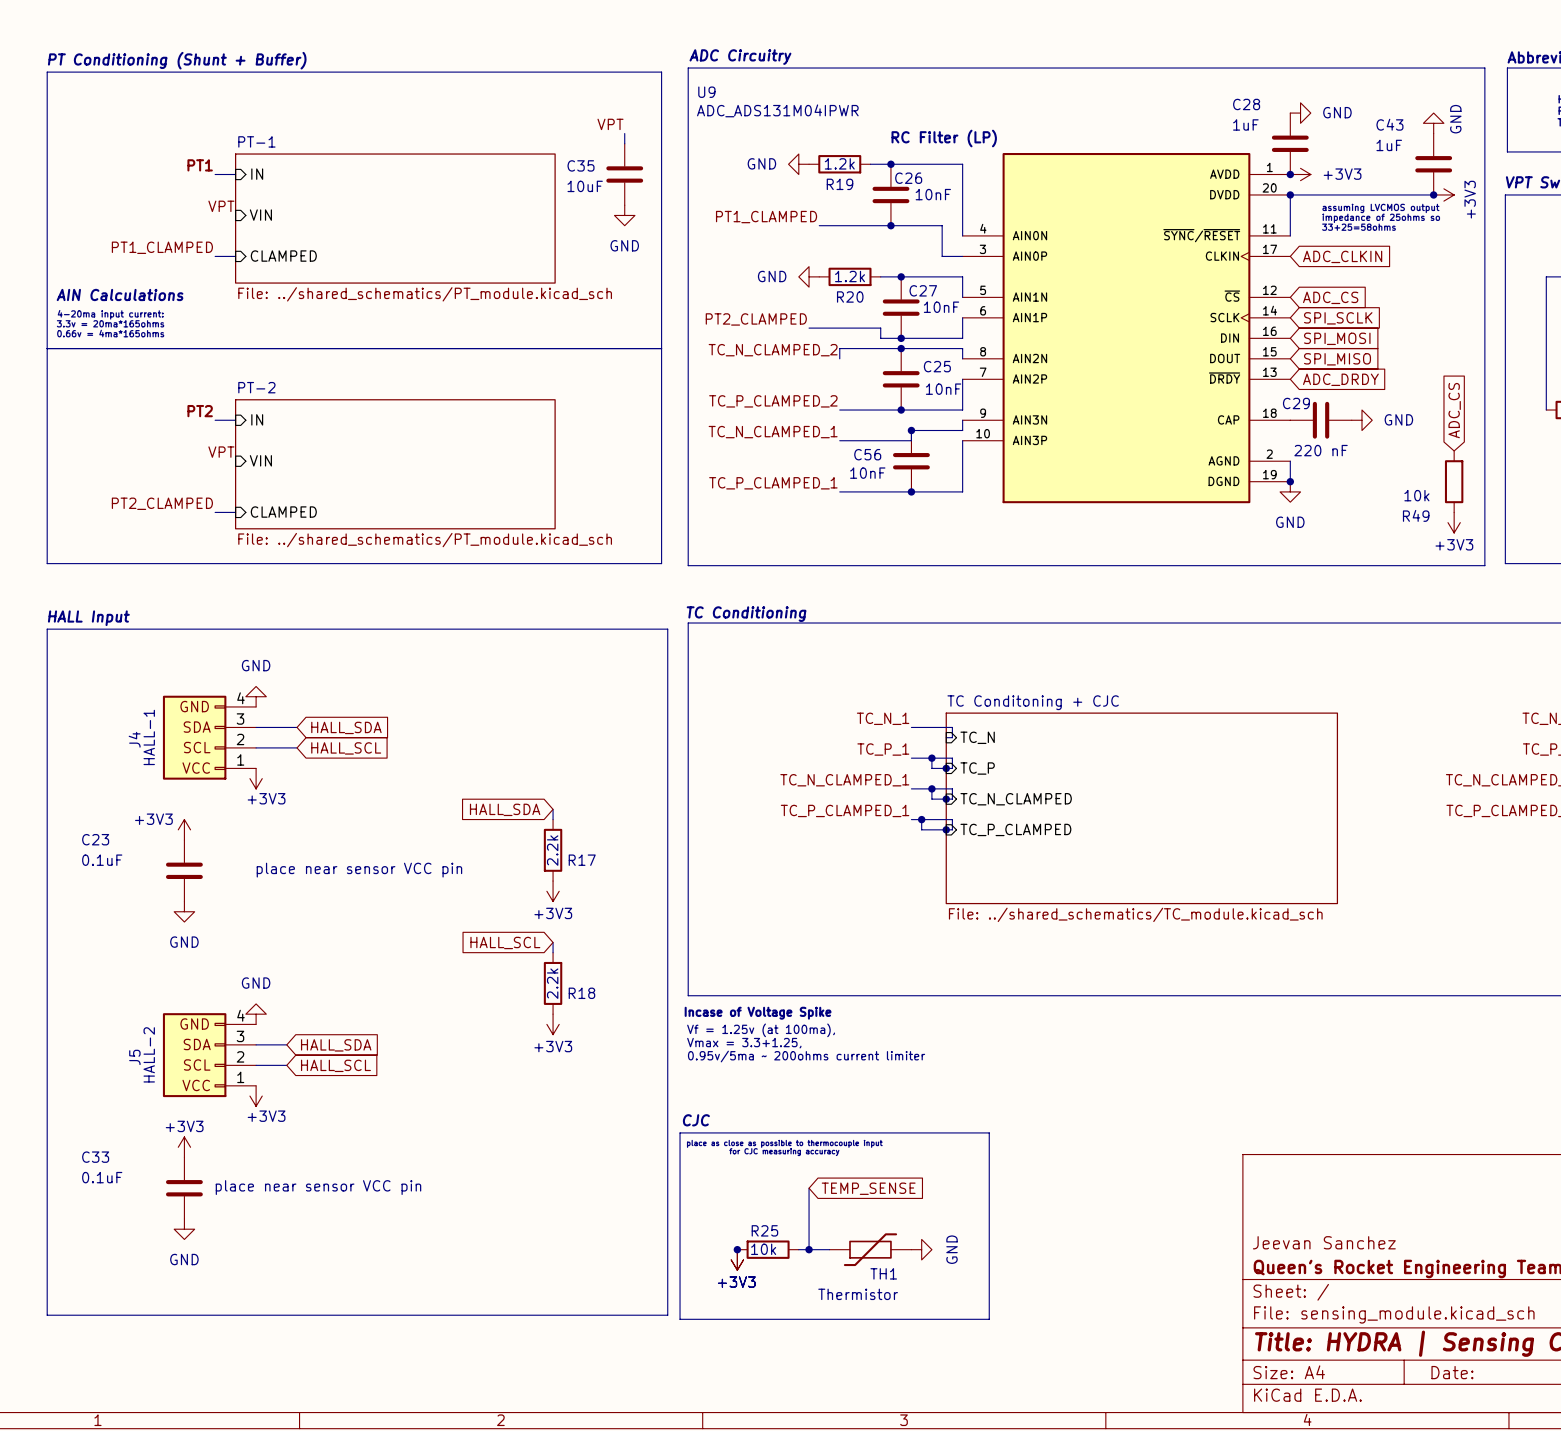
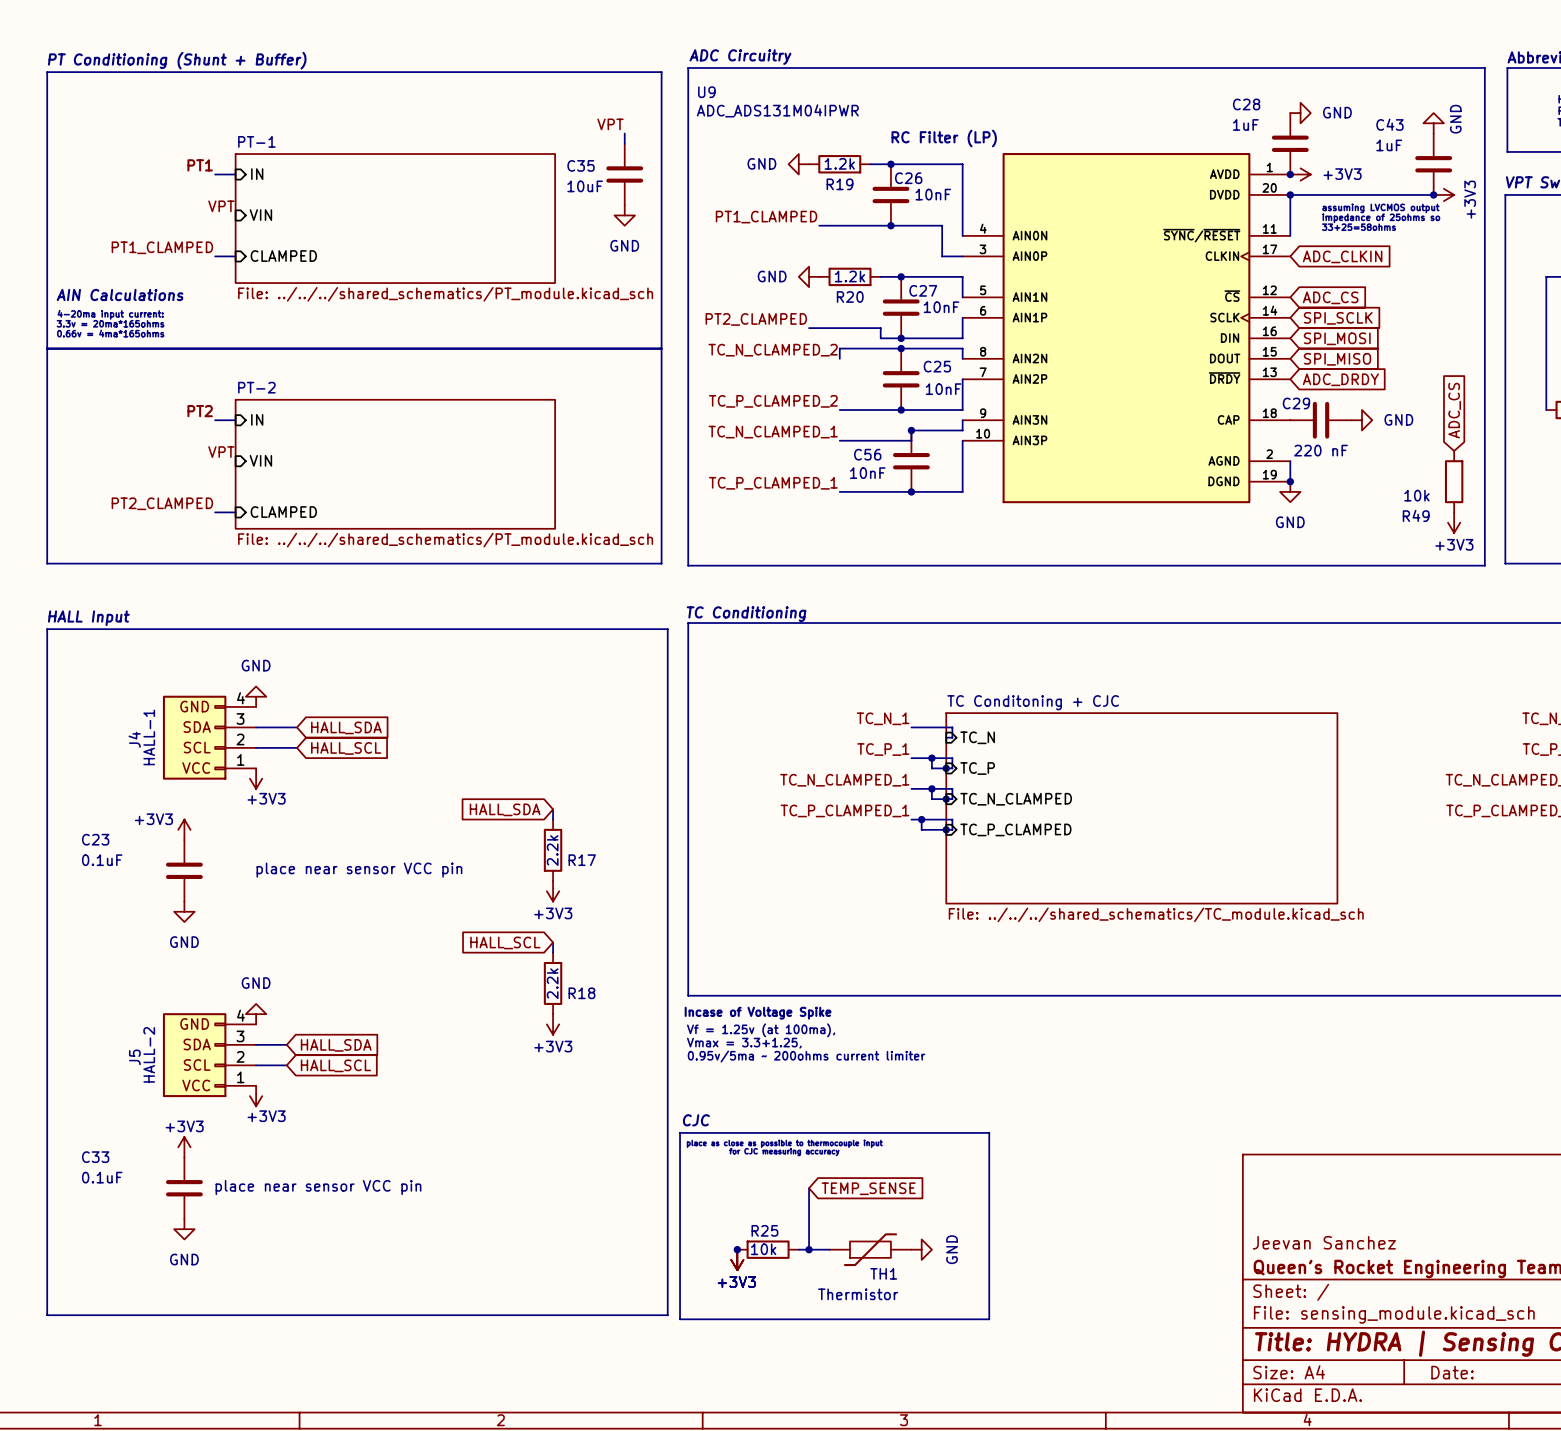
sheet PT-1 value: File: ../shared_schematics/PT_module.kicad_sch (425, 294) -> File: ../../../shared_schematics/PT_module.kicad_sch (445, 294)
sheet PT-2 value: File: ../shared_schematics/PT_module.kicad_sch (425, 540) -> File: ../../../shared_schematics/PT_module.kicad_sch (445, 540)
sheet TC Conditoning + CJC value: File: ../shared_schematics/TC_module.kicad_sch (1135, 914) -> File: ../../../shared_schematics/TC_module.kicad_sch (1156, 914)

